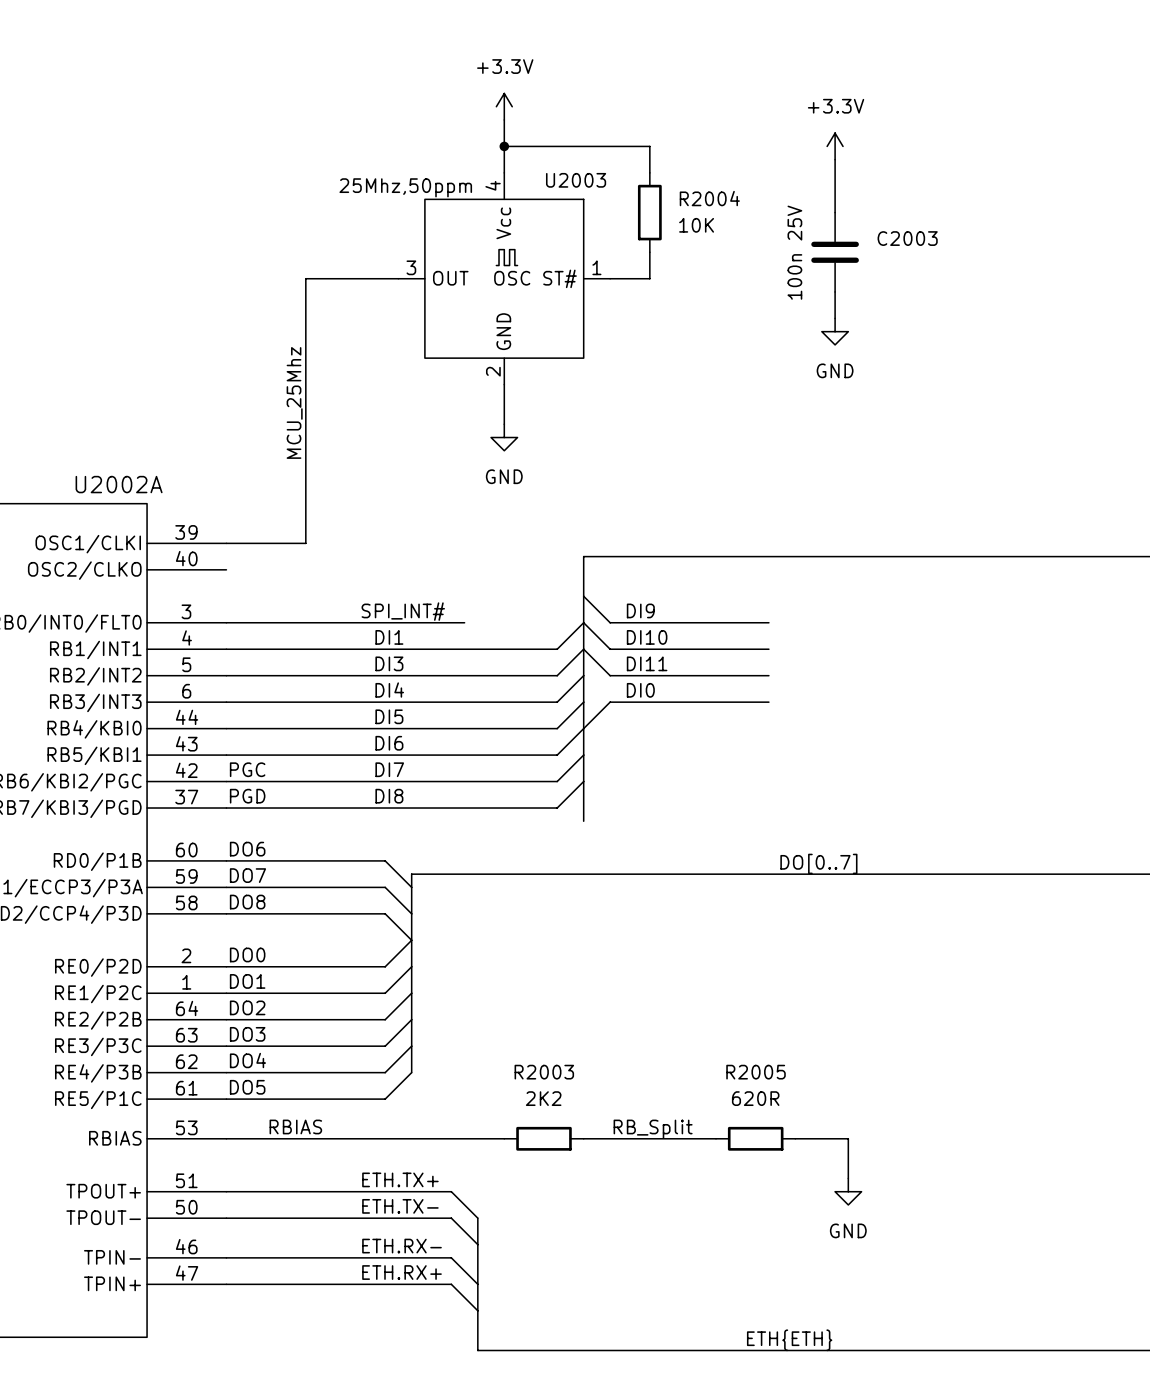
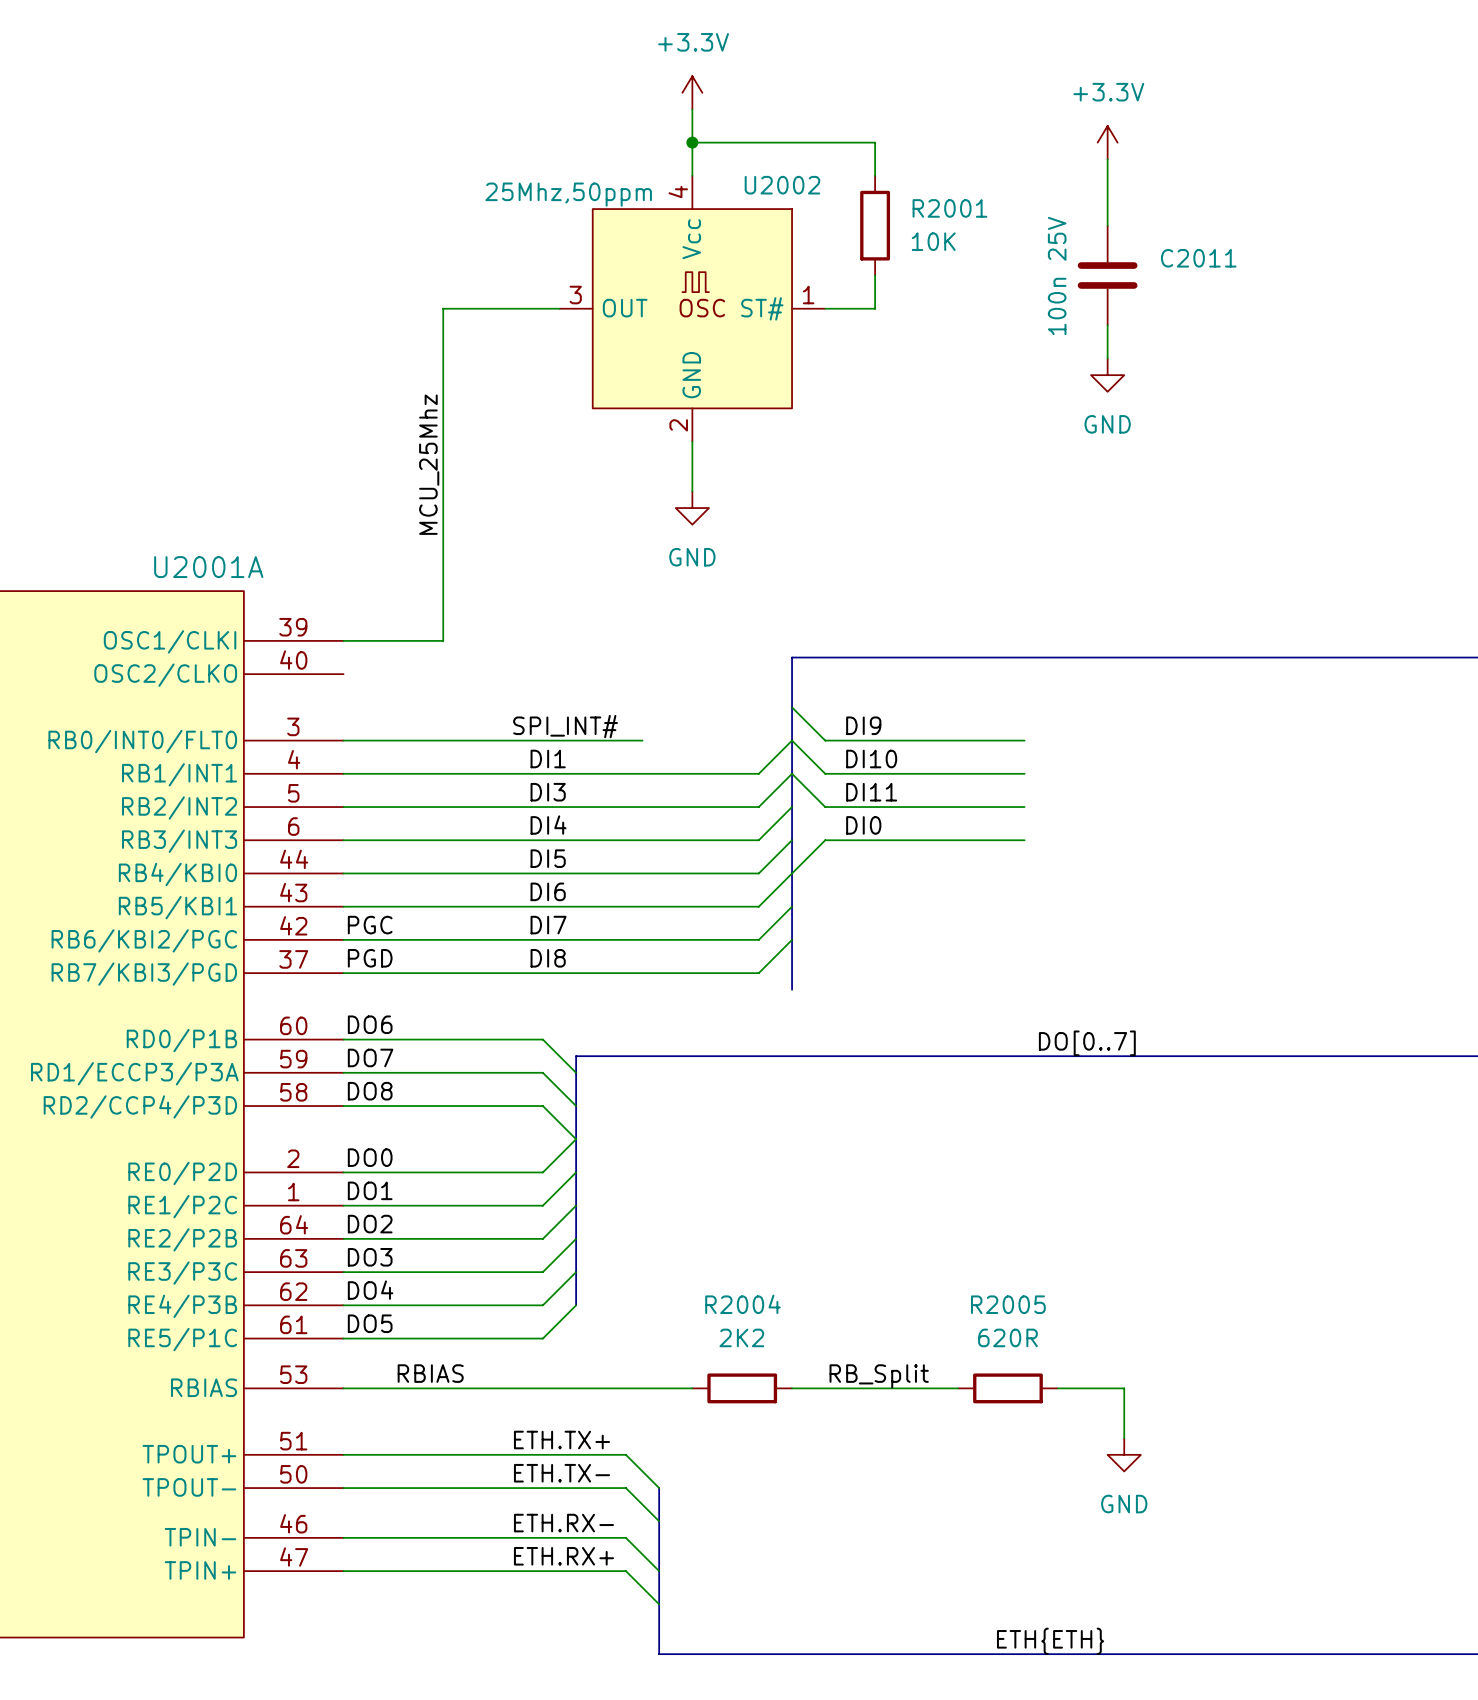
U2003 name: U2003 (576, 180) -> U2002 (782, 185)
R2004 name: R2004 (709, 198) -> R2001 (949, 208)
C2003 name: C2003 (907, 238) -> C2011 (1198, 258)
U2002A name: U2002A (119, 484) -> U2001A (208, 567)
R2003 name: R2003 (544, 1072) -> R2004 (742, 1304)

